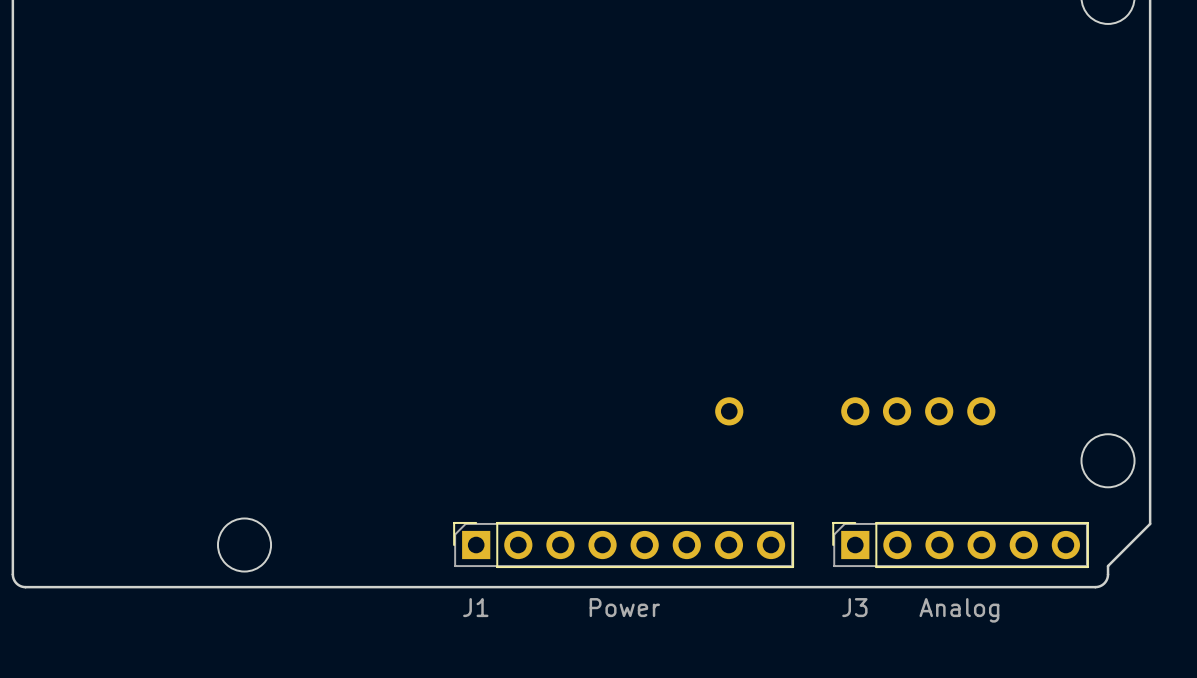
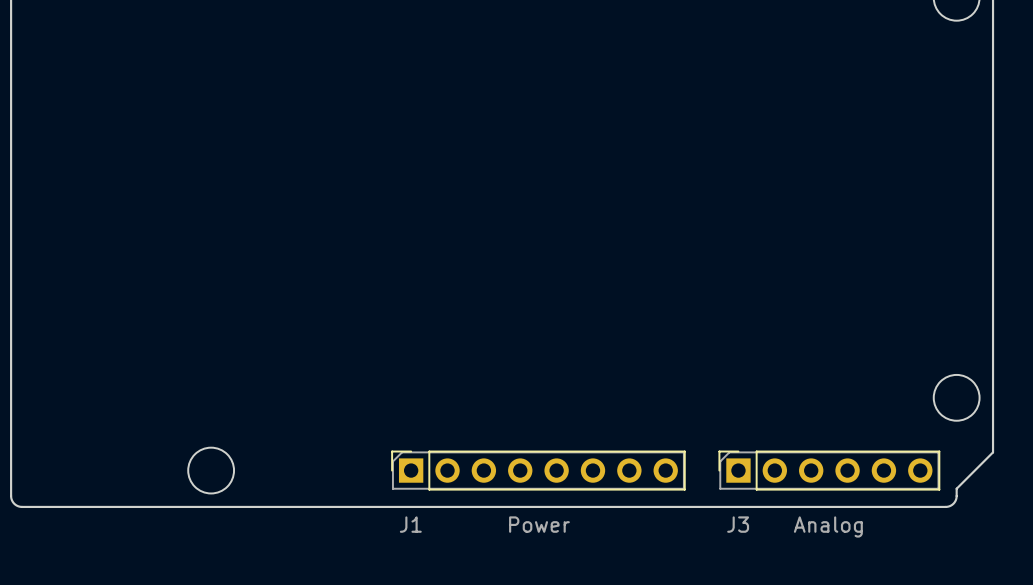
part: (729, 411) -> none
part: (855, 411) -> none
part: (897, 411) -> none
part: (939, 411) -> none
part: (981, 411) -> none

